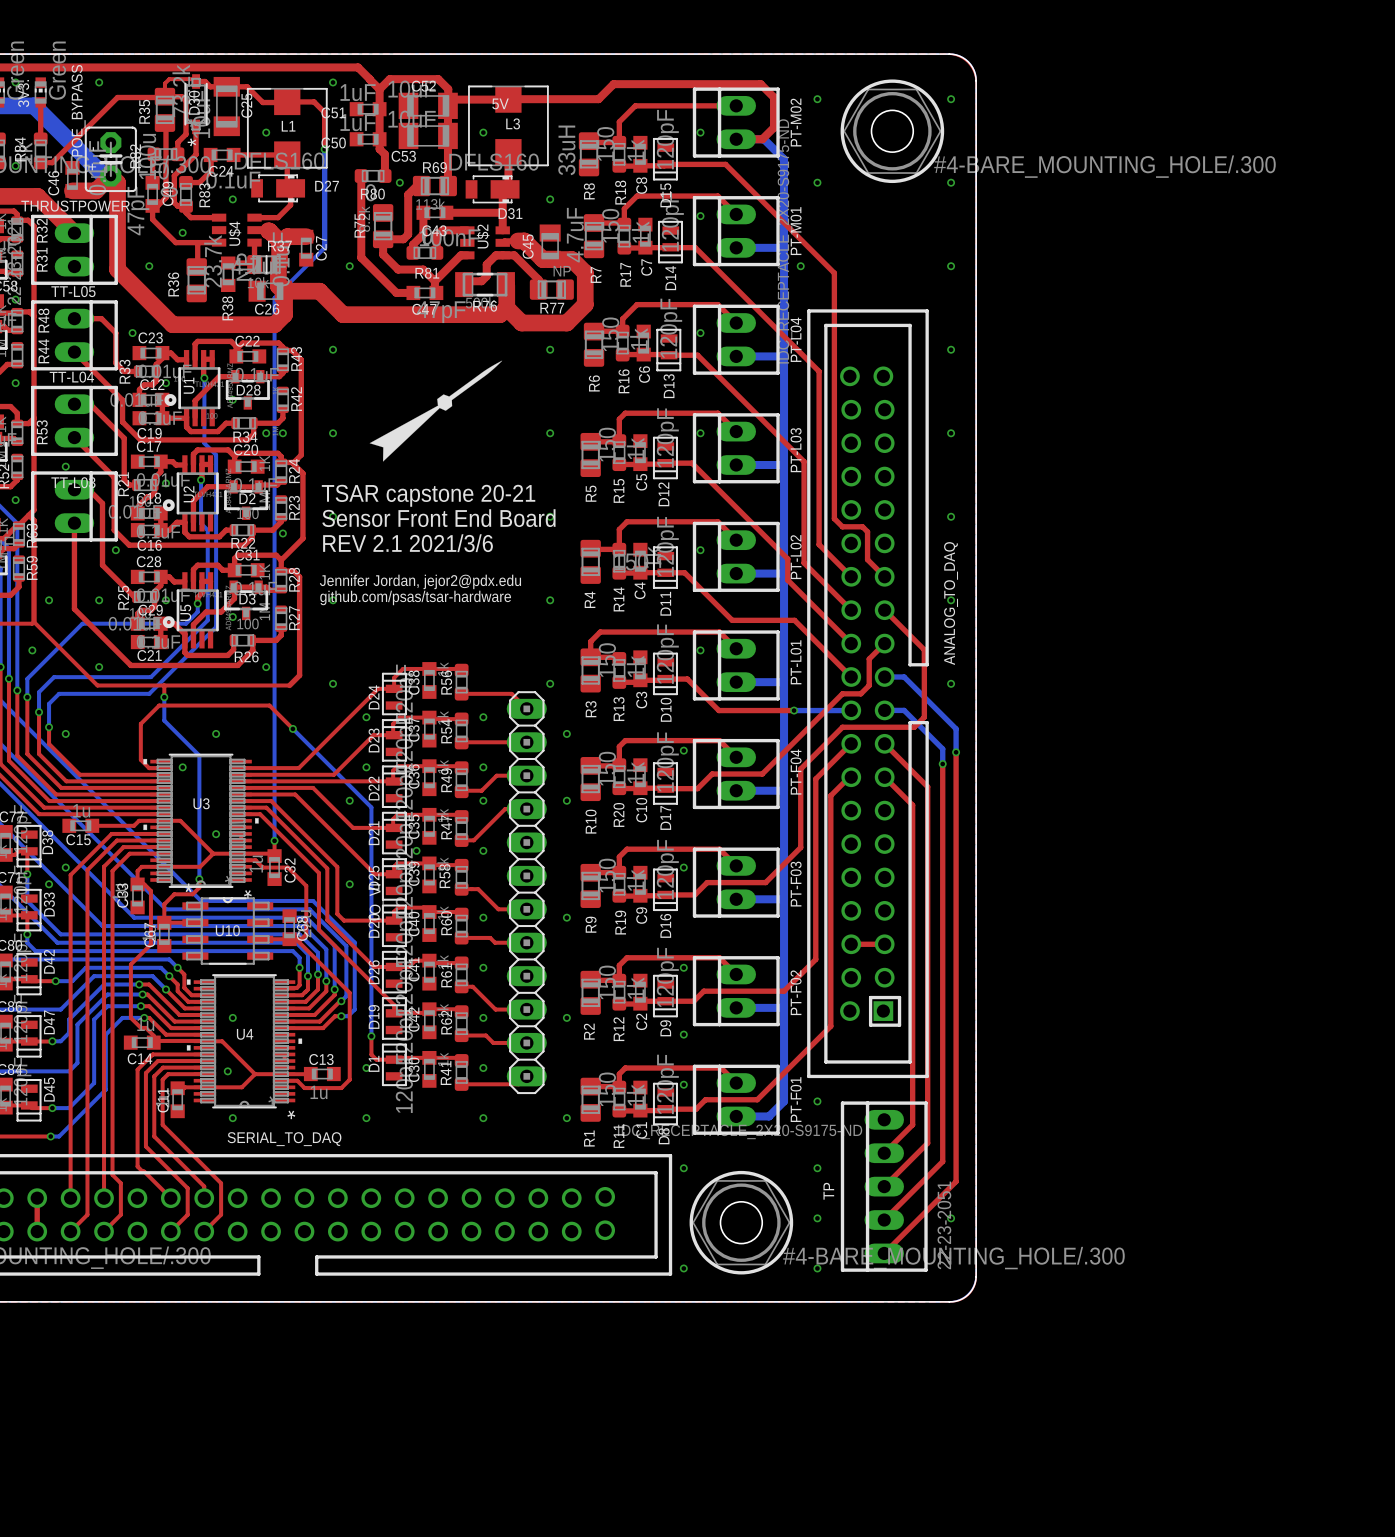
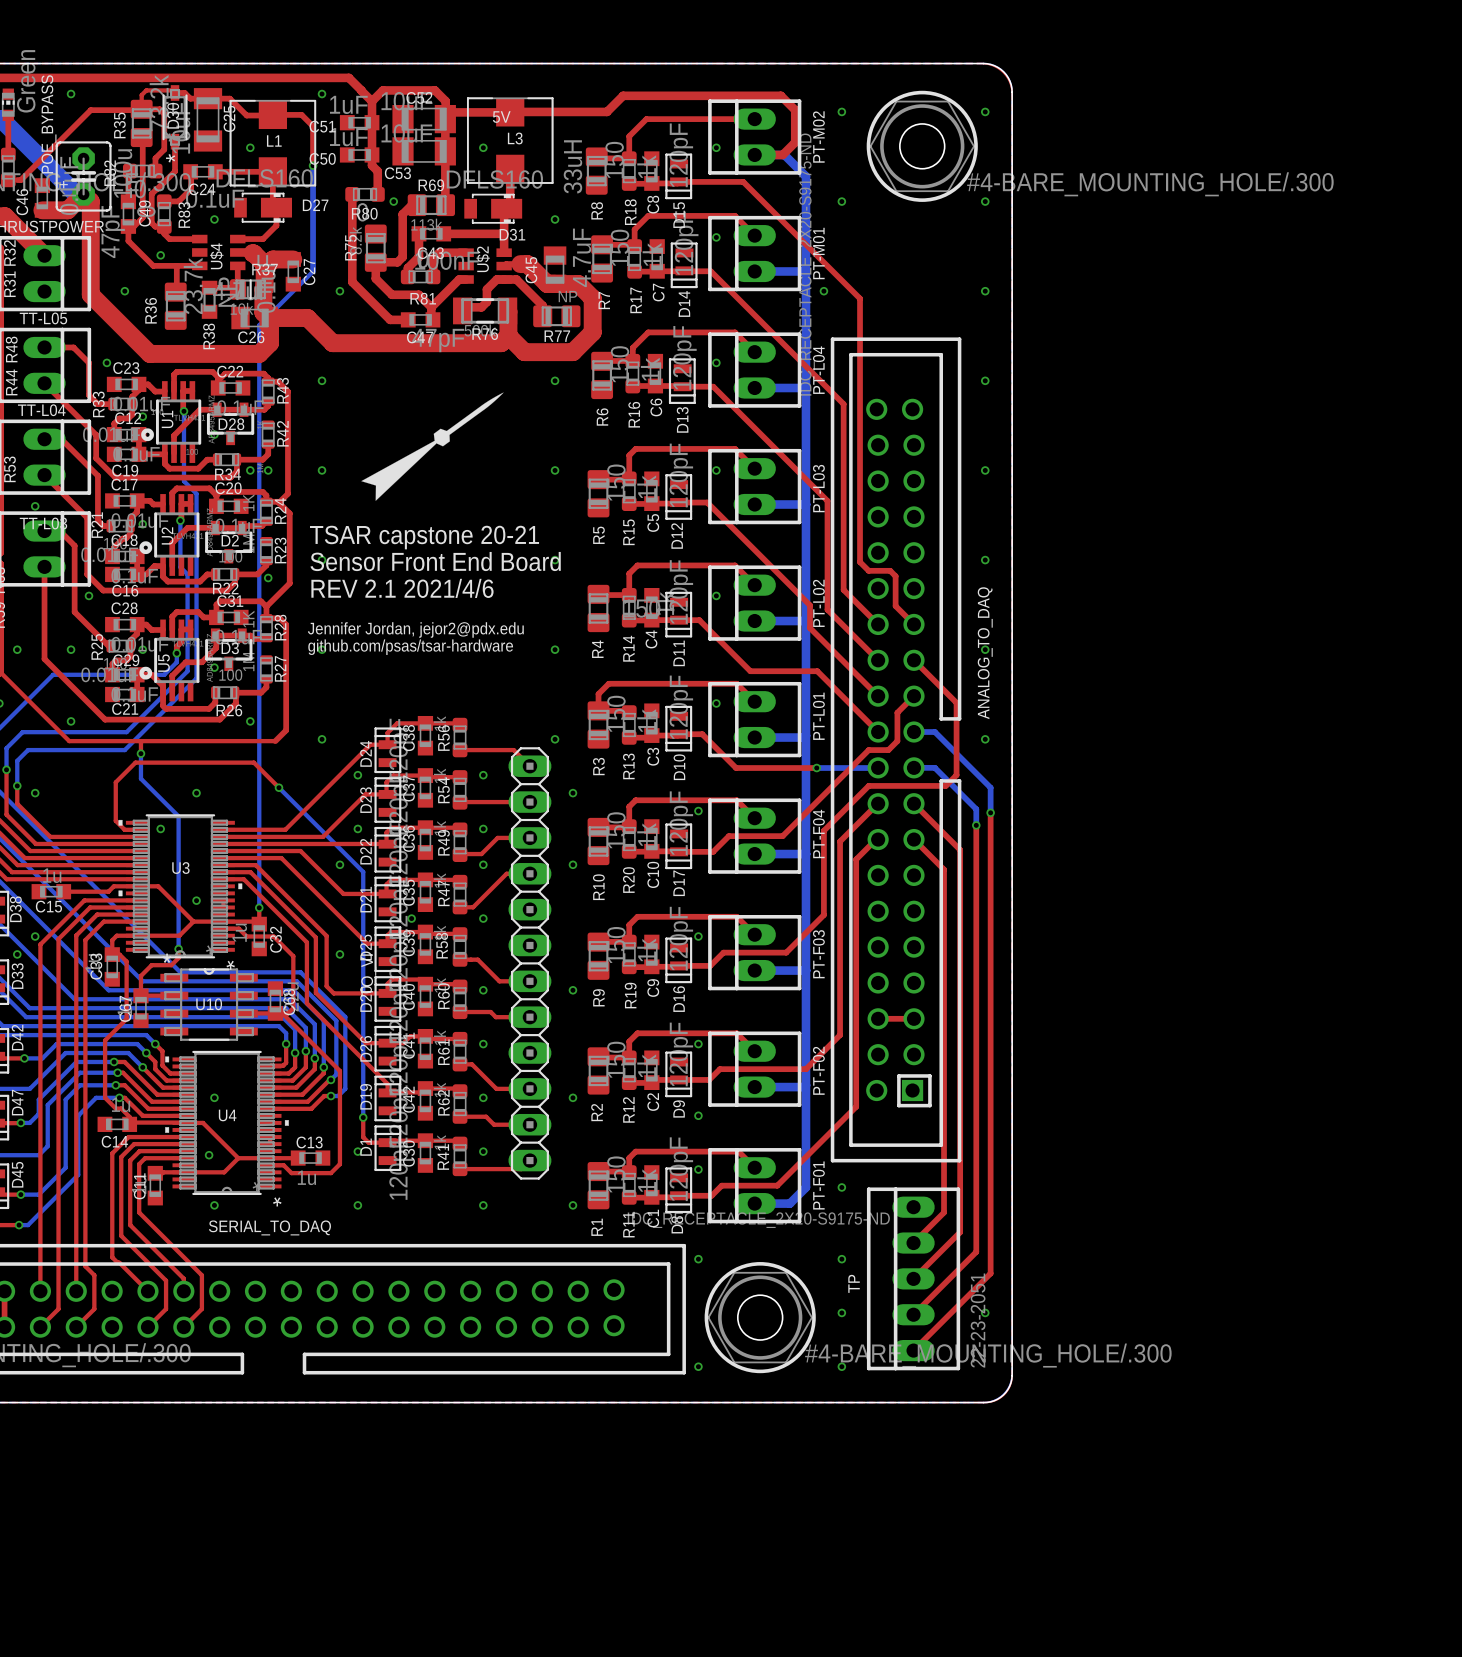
text: REV 2.1 2021/3/6 (408, 543) -> REV 2.1 2021/4/6 (402, 588)

